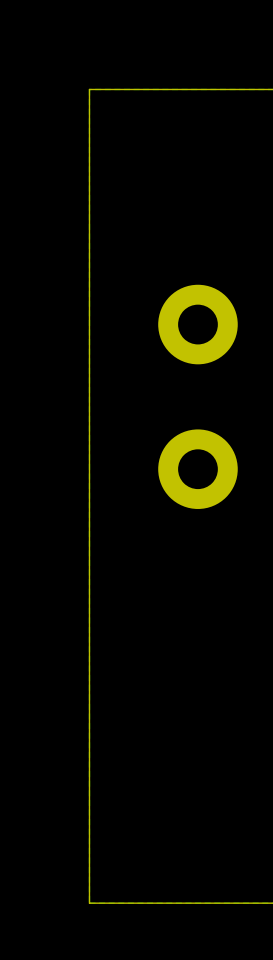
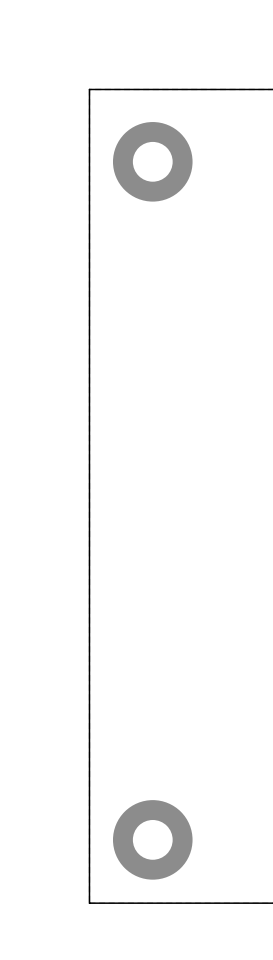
part: none -> (152, 161)
part: (197, 324) -> none
part: (197, 469) -> none
part: none -> (152, 839)

